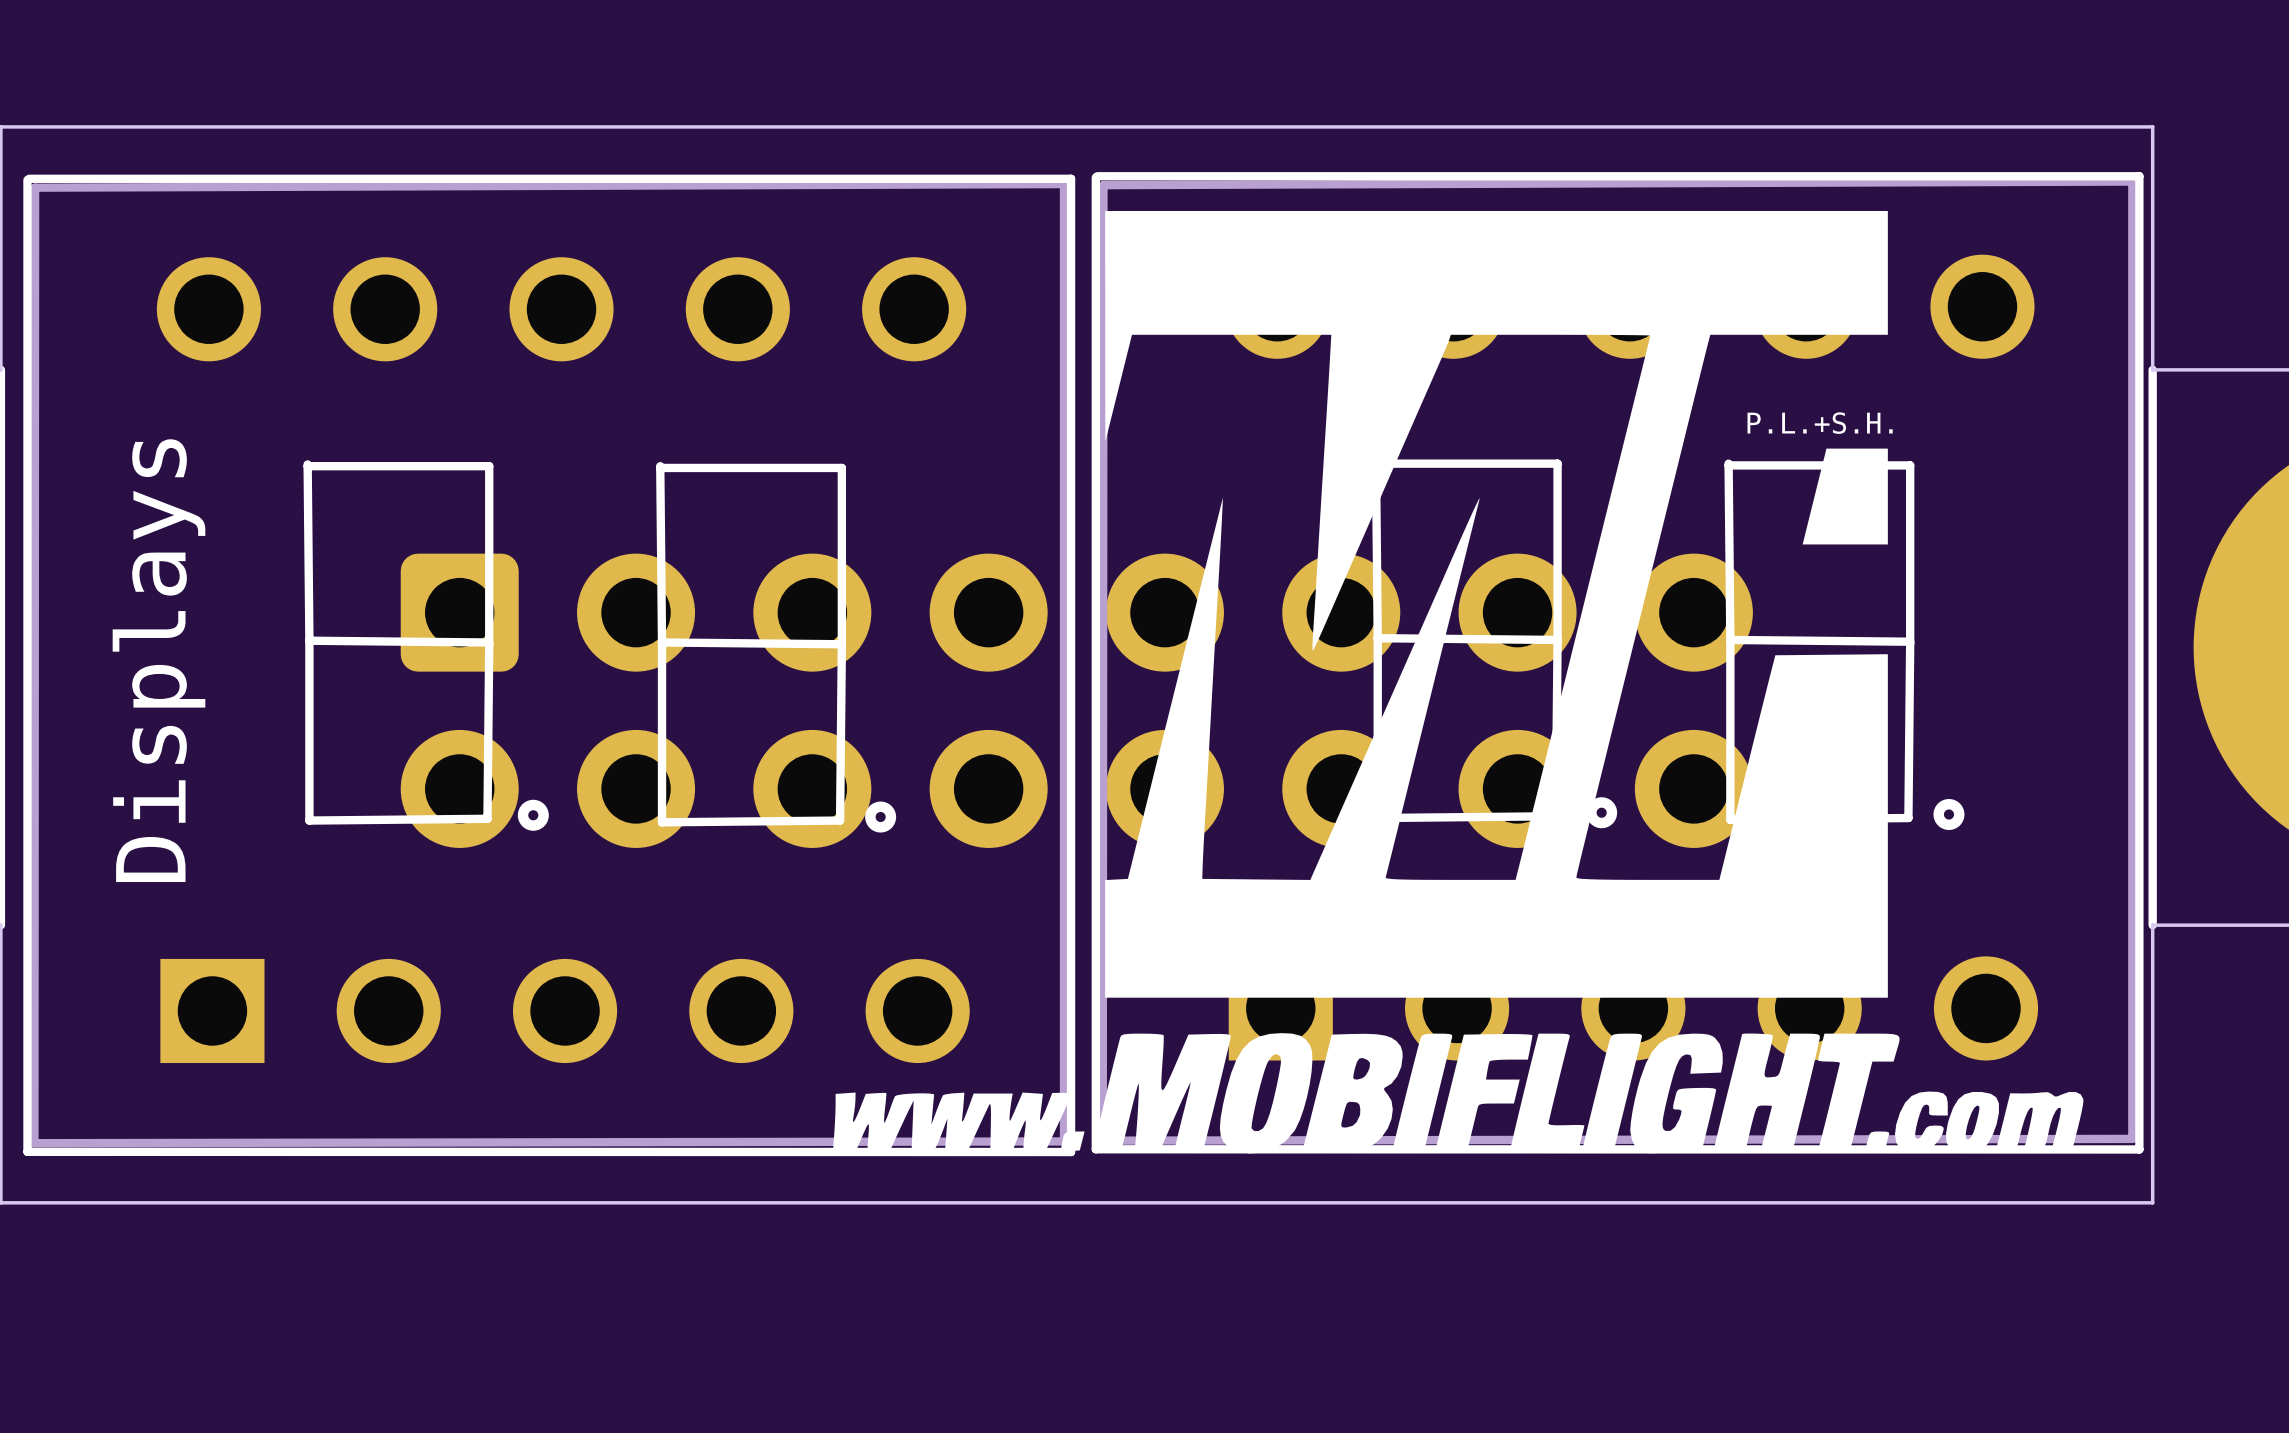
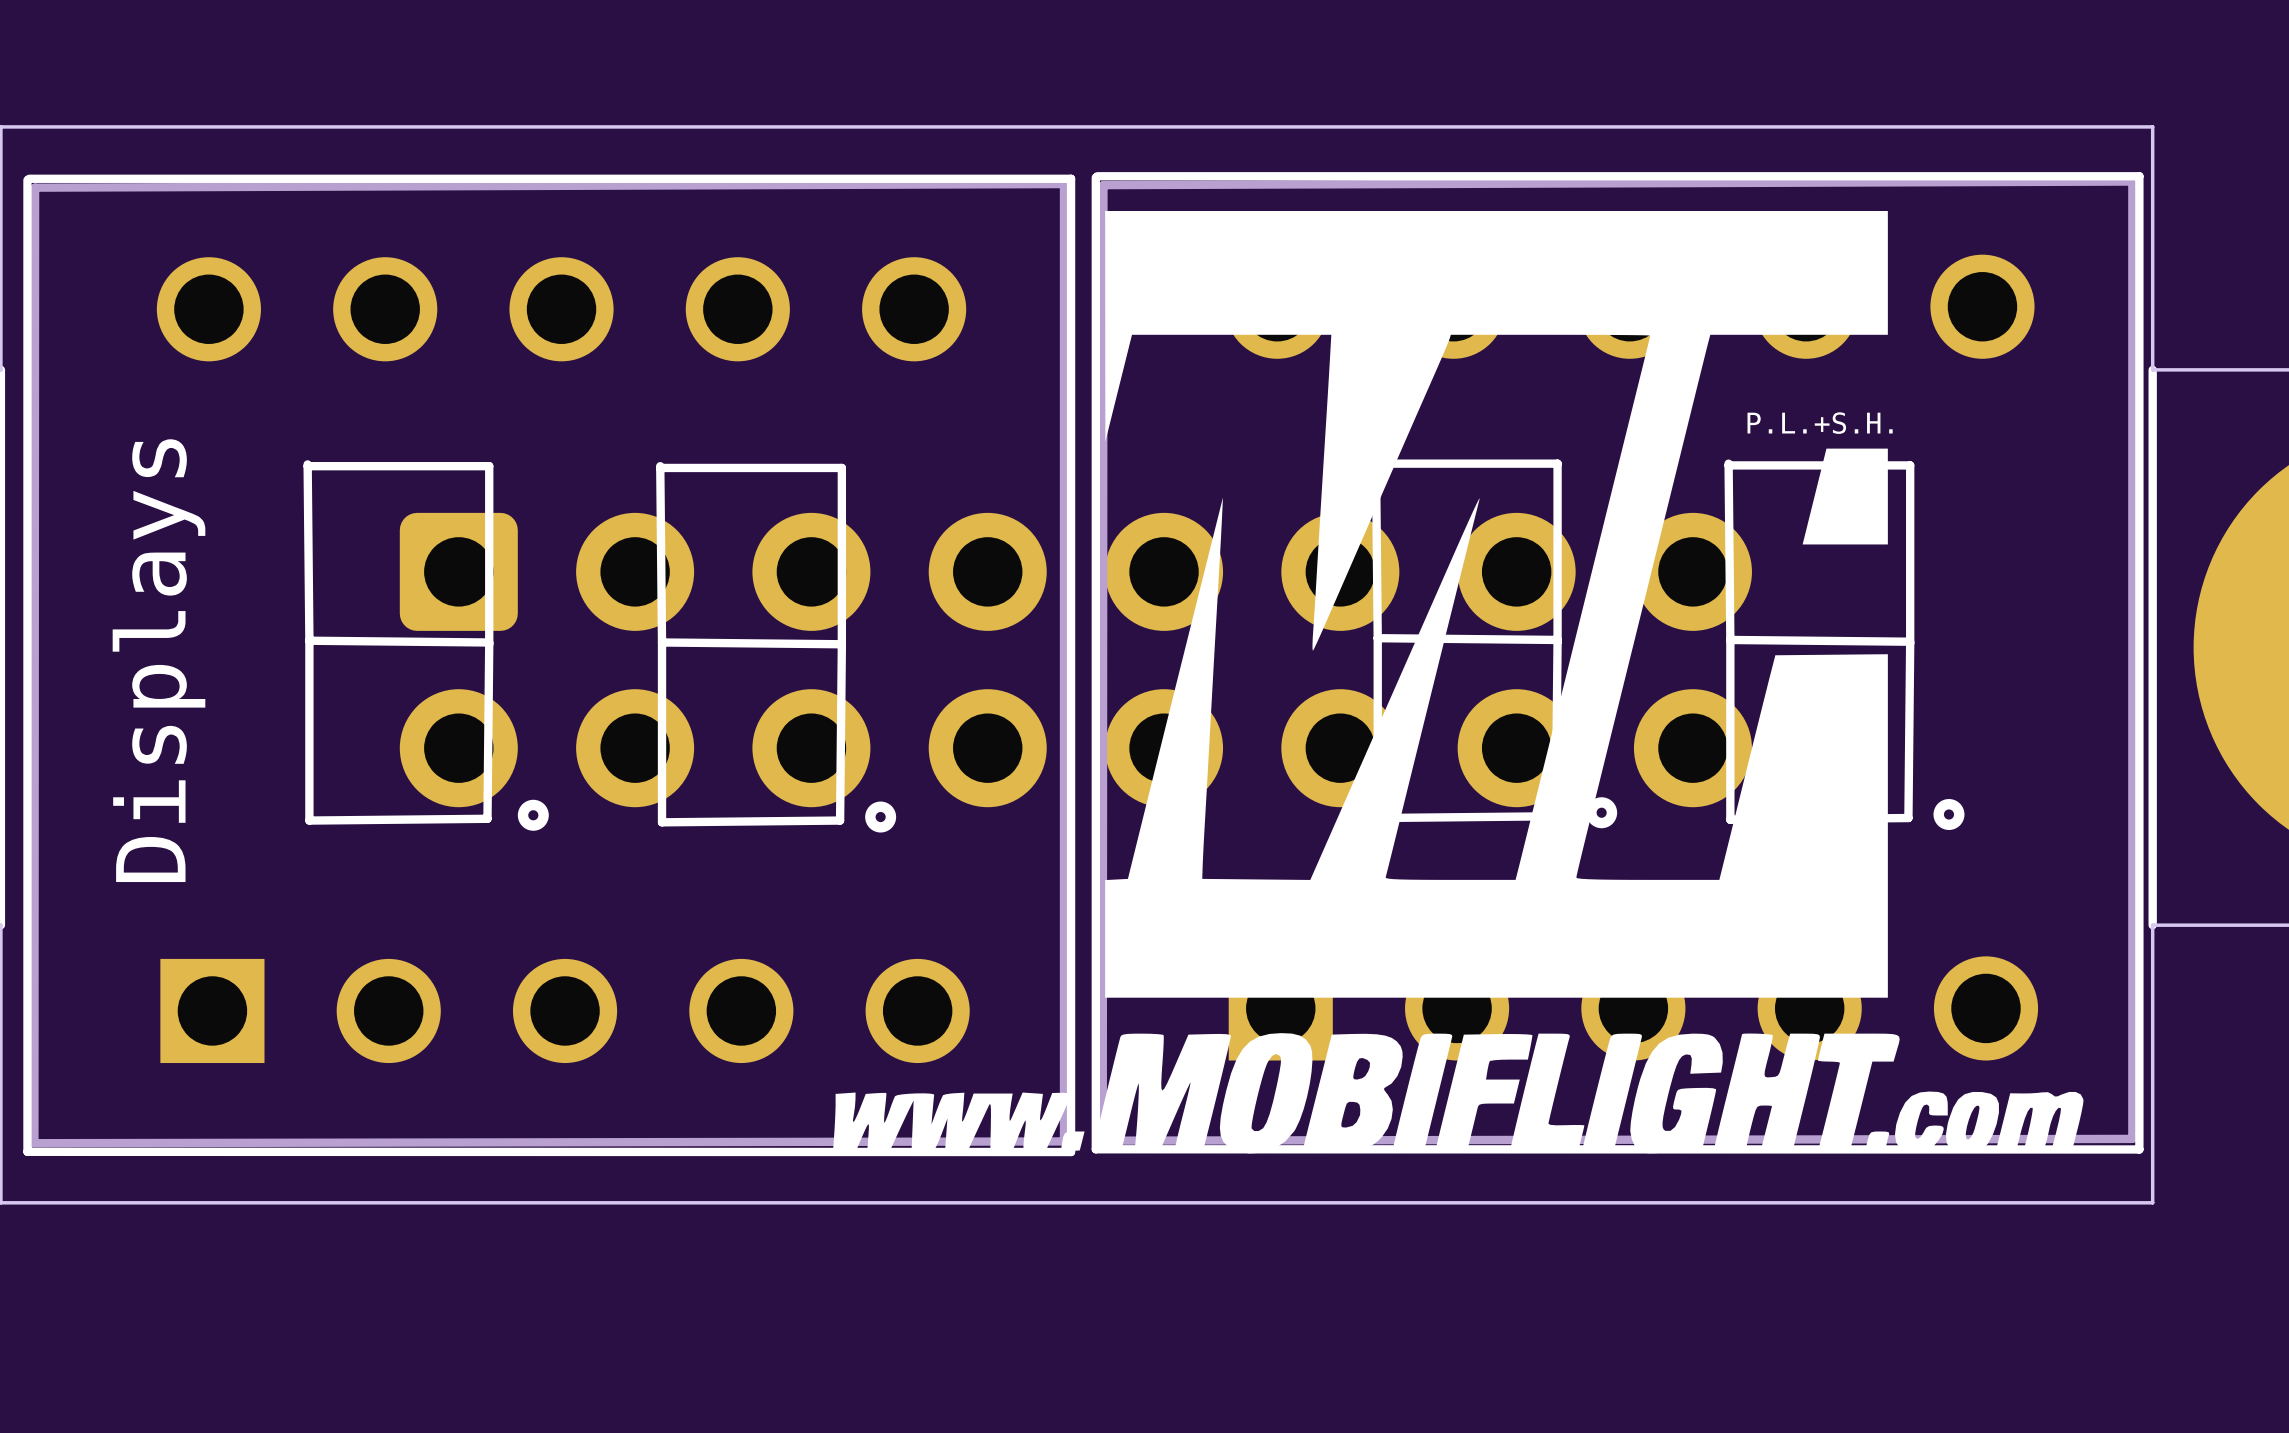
part position: (1076, 700) -> (1075, 660)

